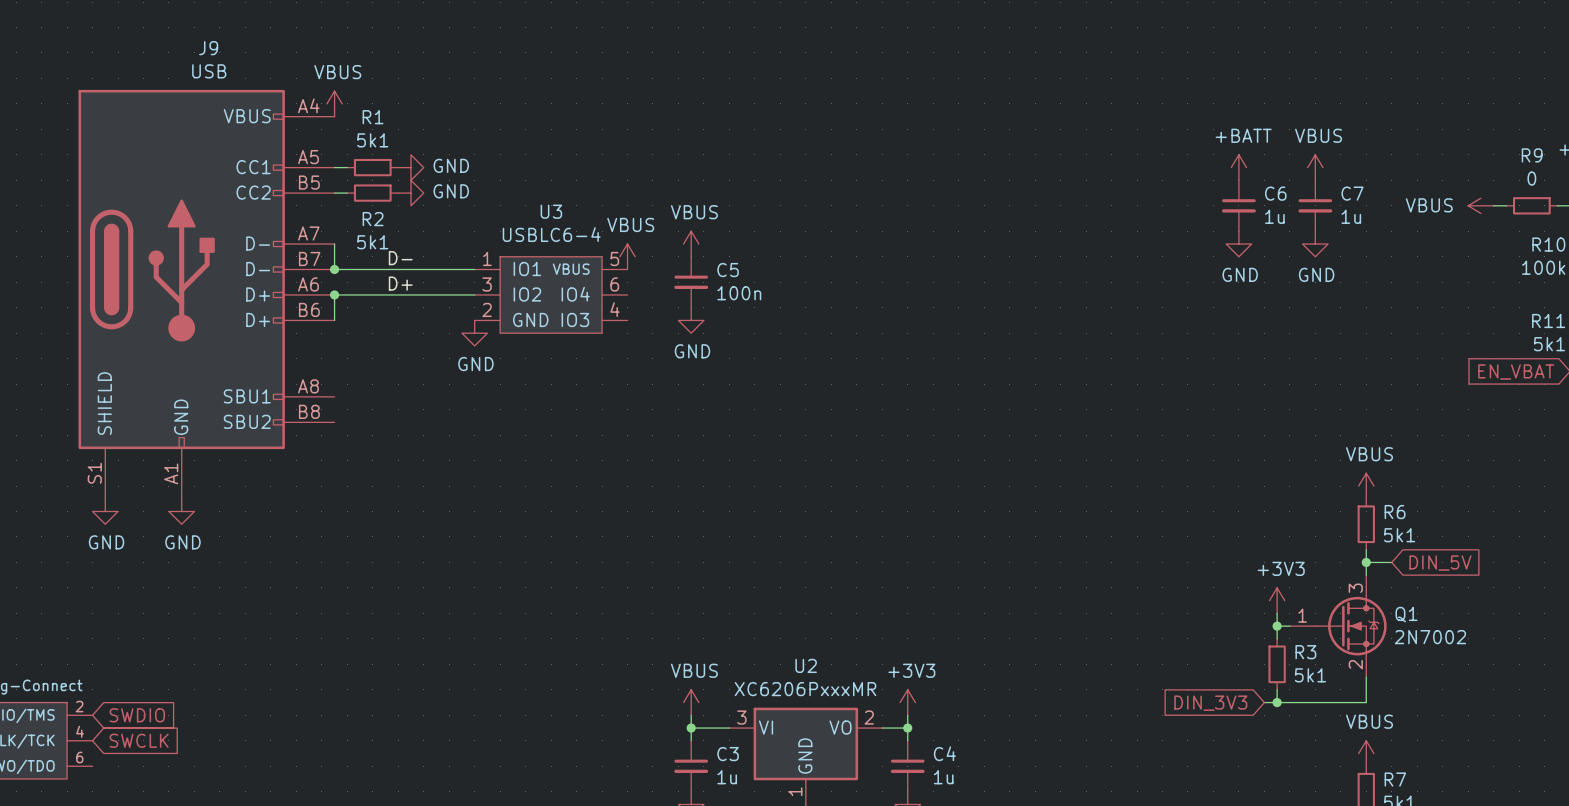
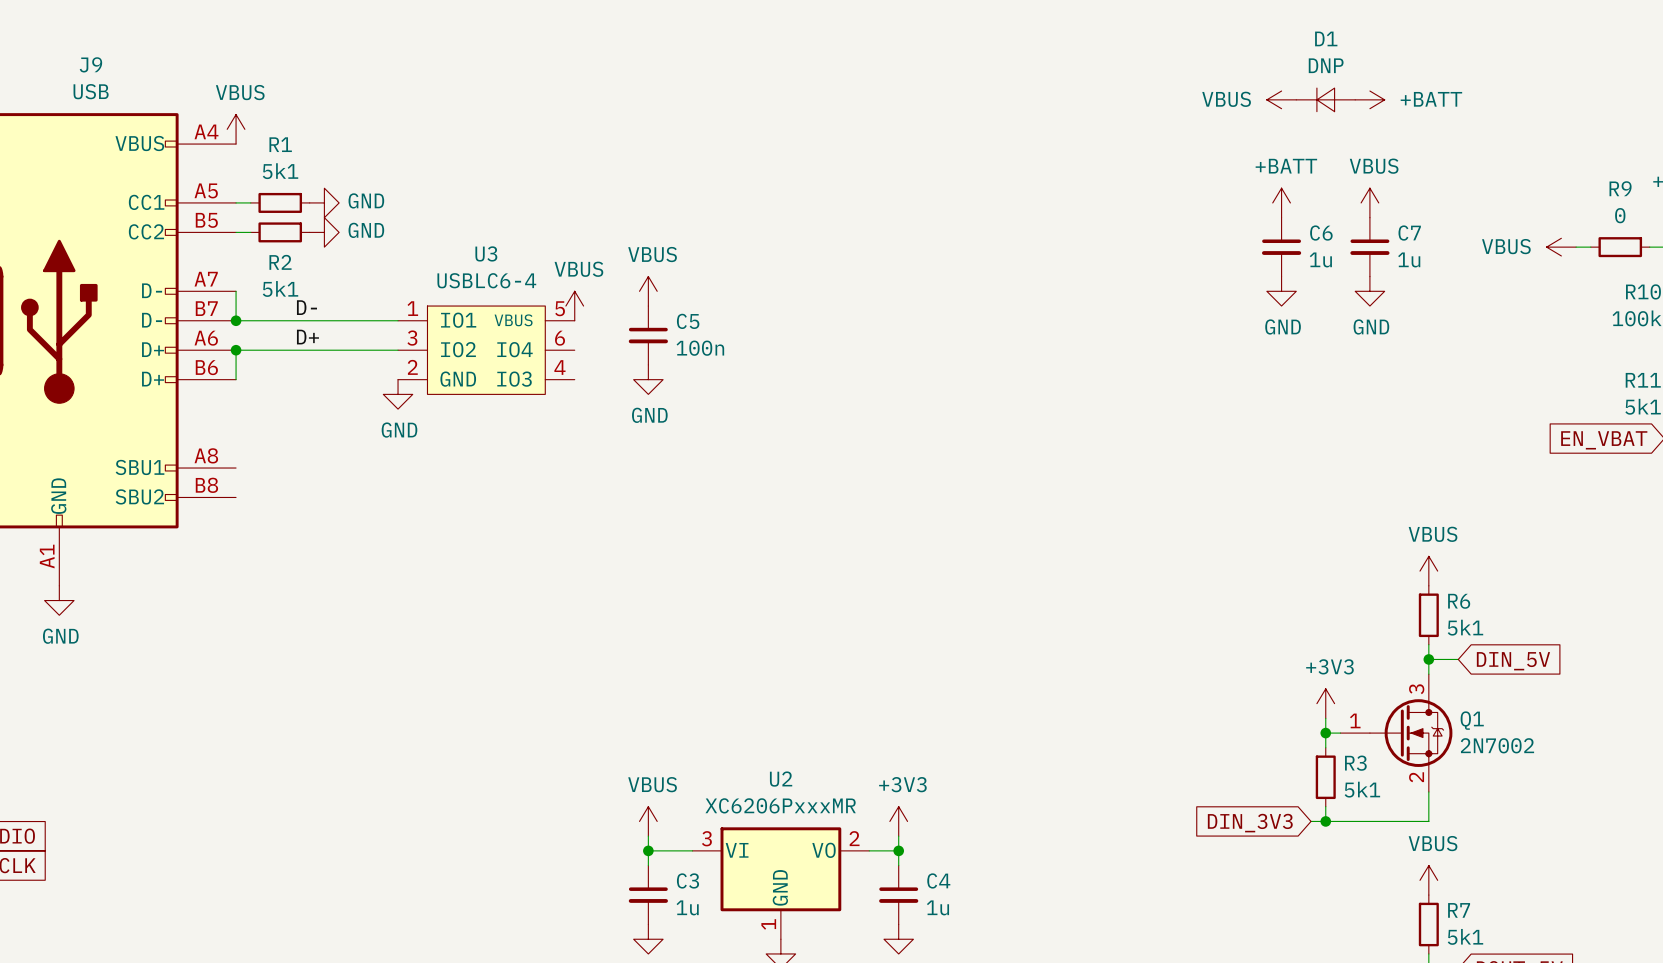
power symbol: none -> VBUS (1281, 99)
D1: none -> DNP (1325, 99)
power symbol: none -> +BATT (1369, 99)

